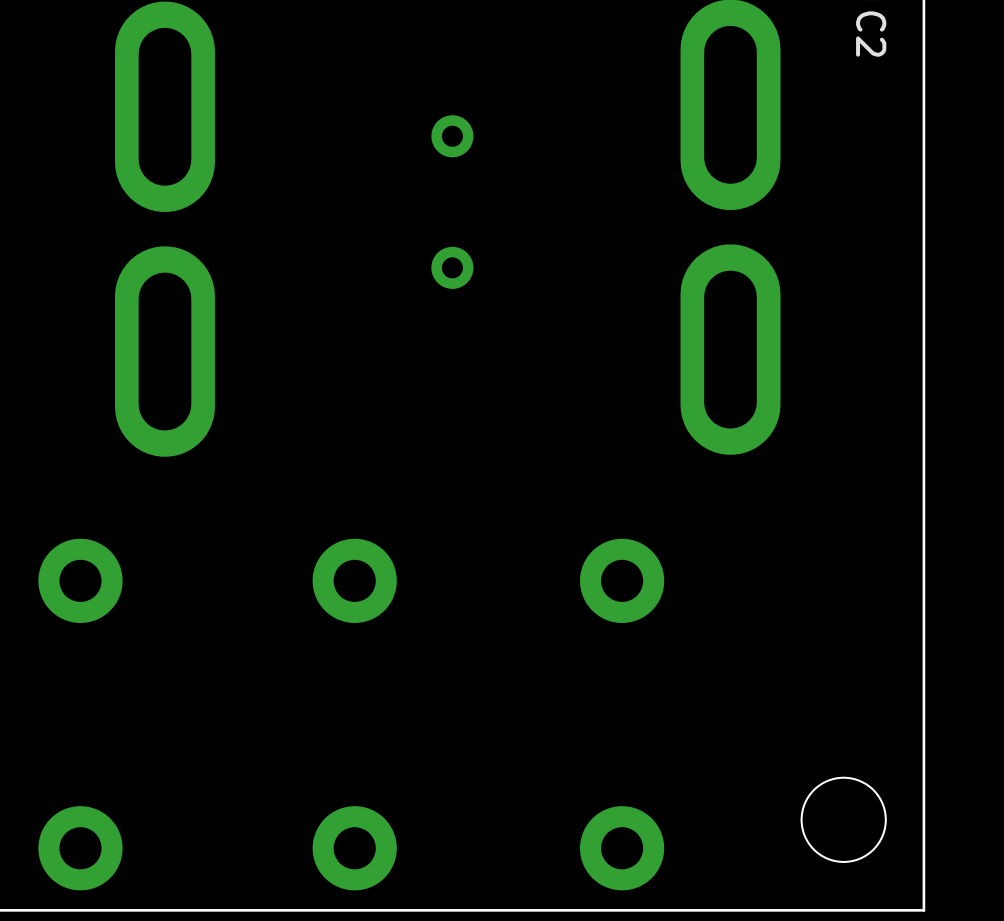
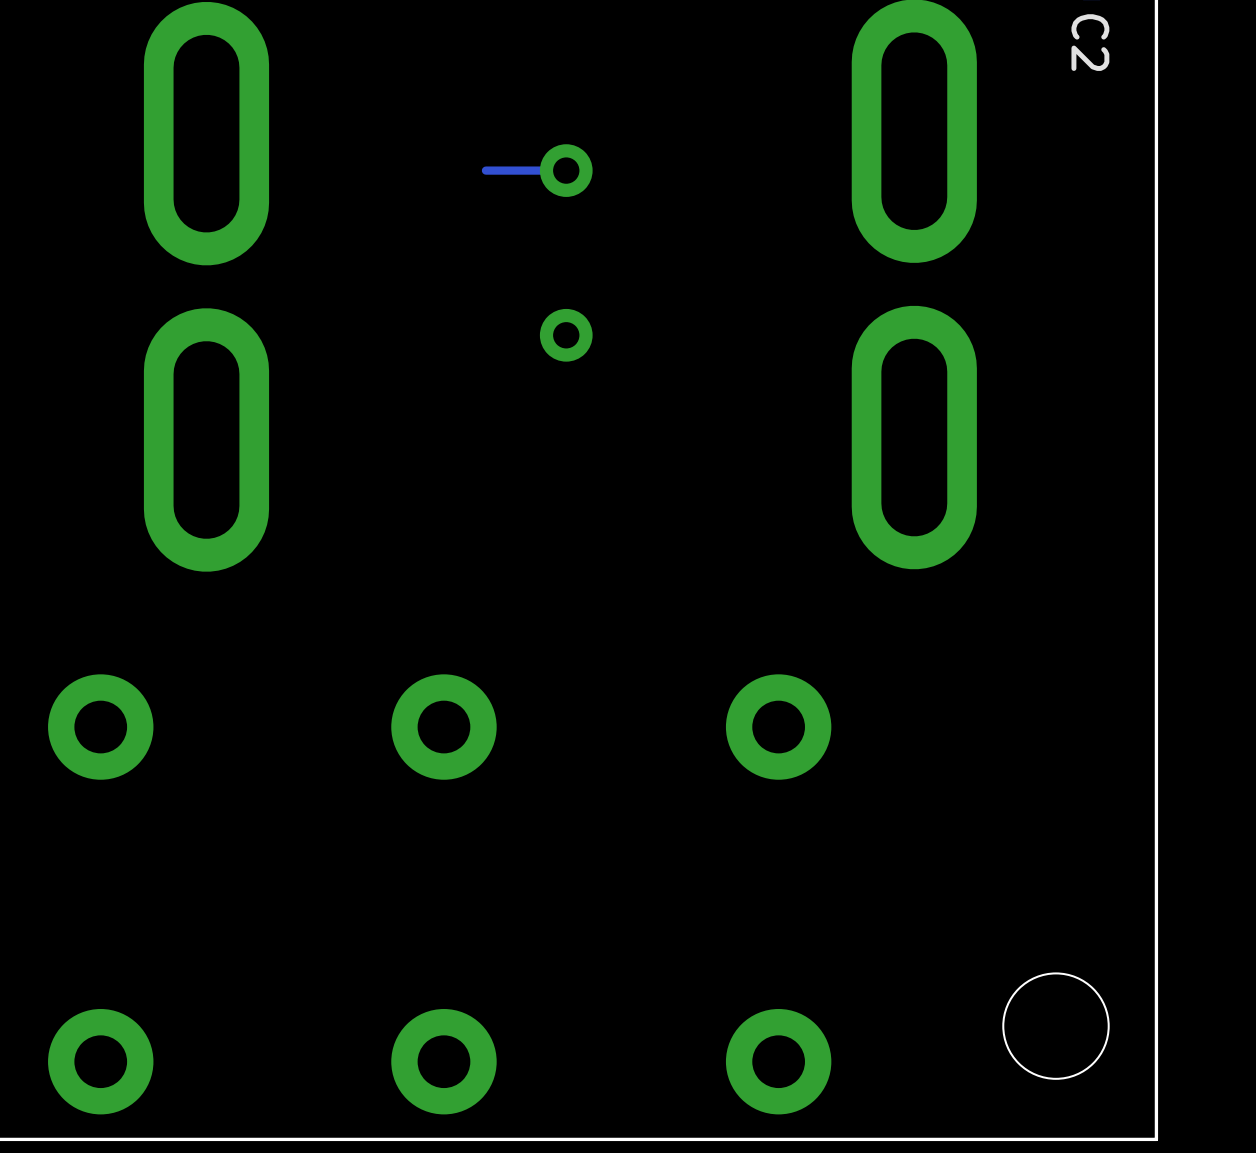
track: none -> (566, 170) (485, 170)

